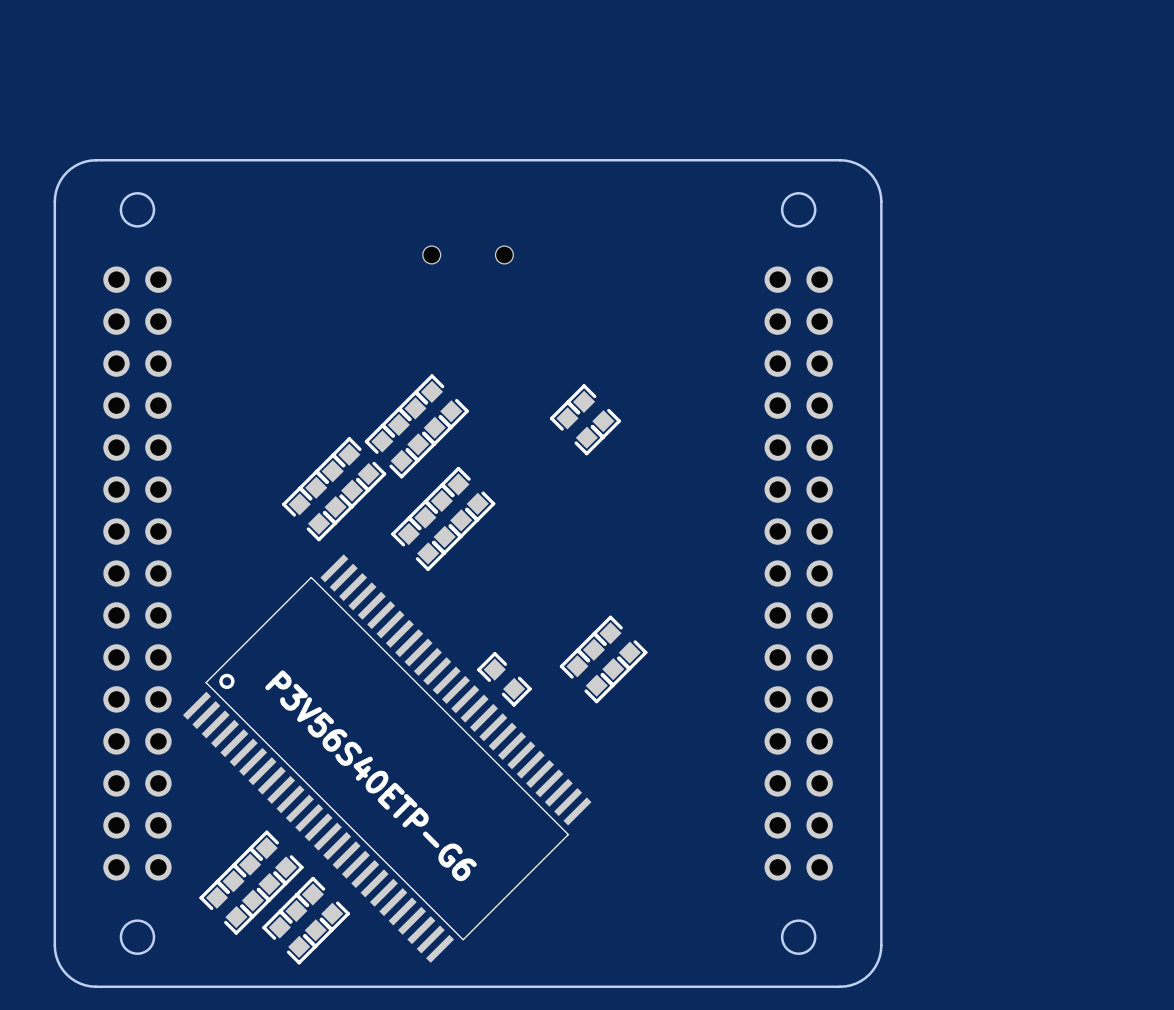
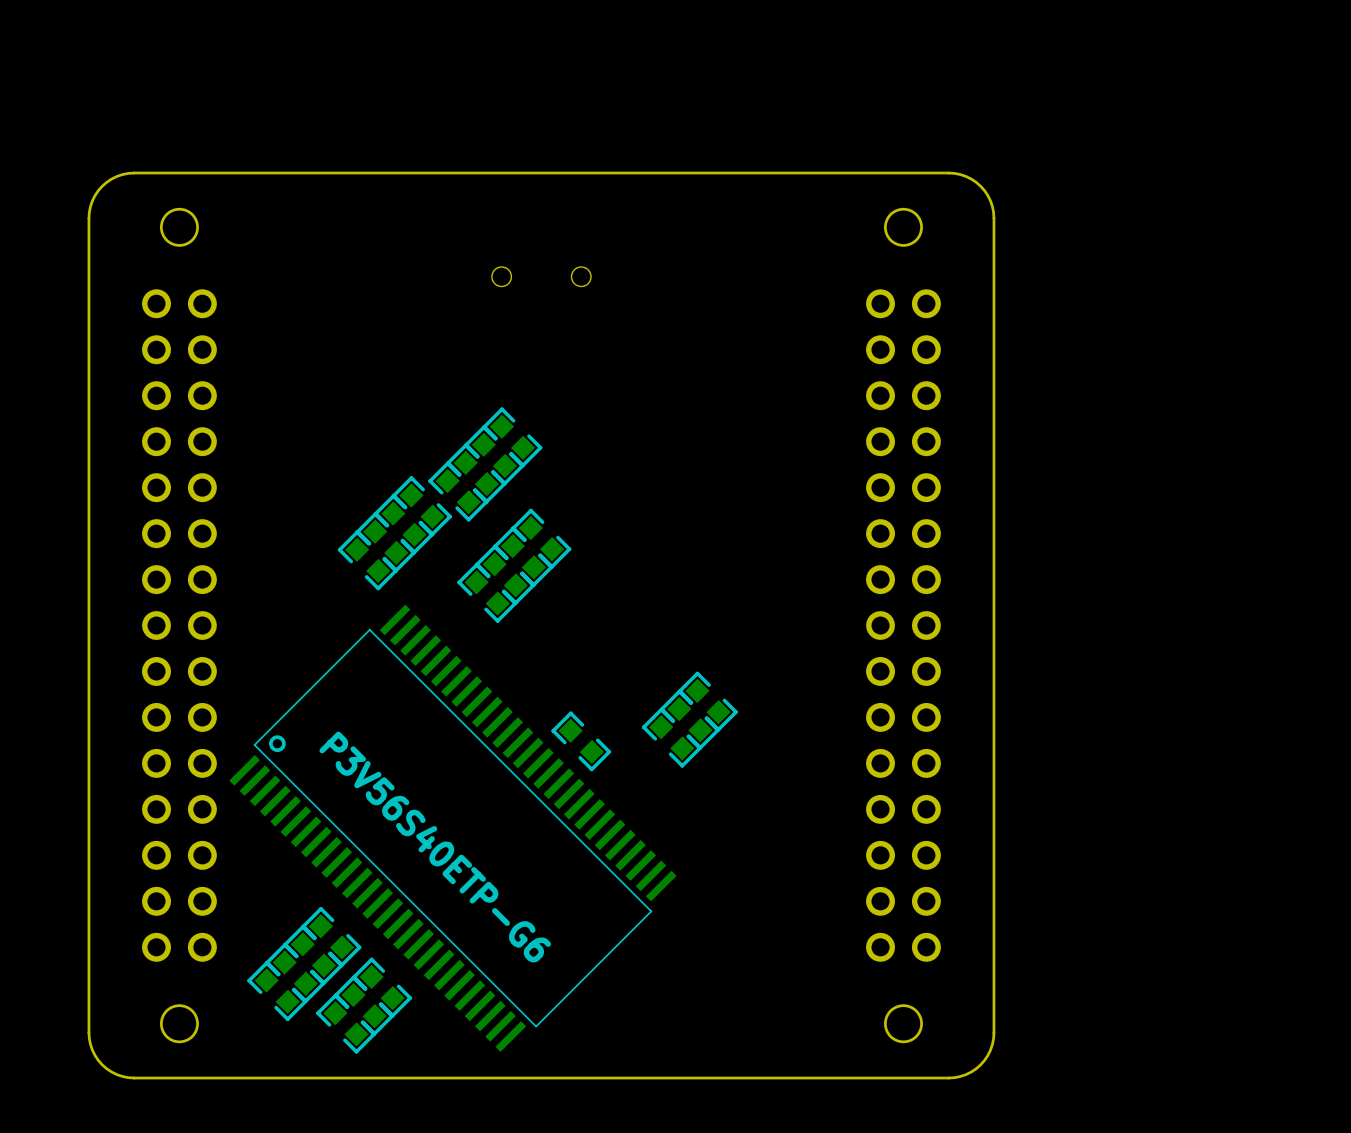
part: (593, 411) -> none
part: (577, 428) -> none

